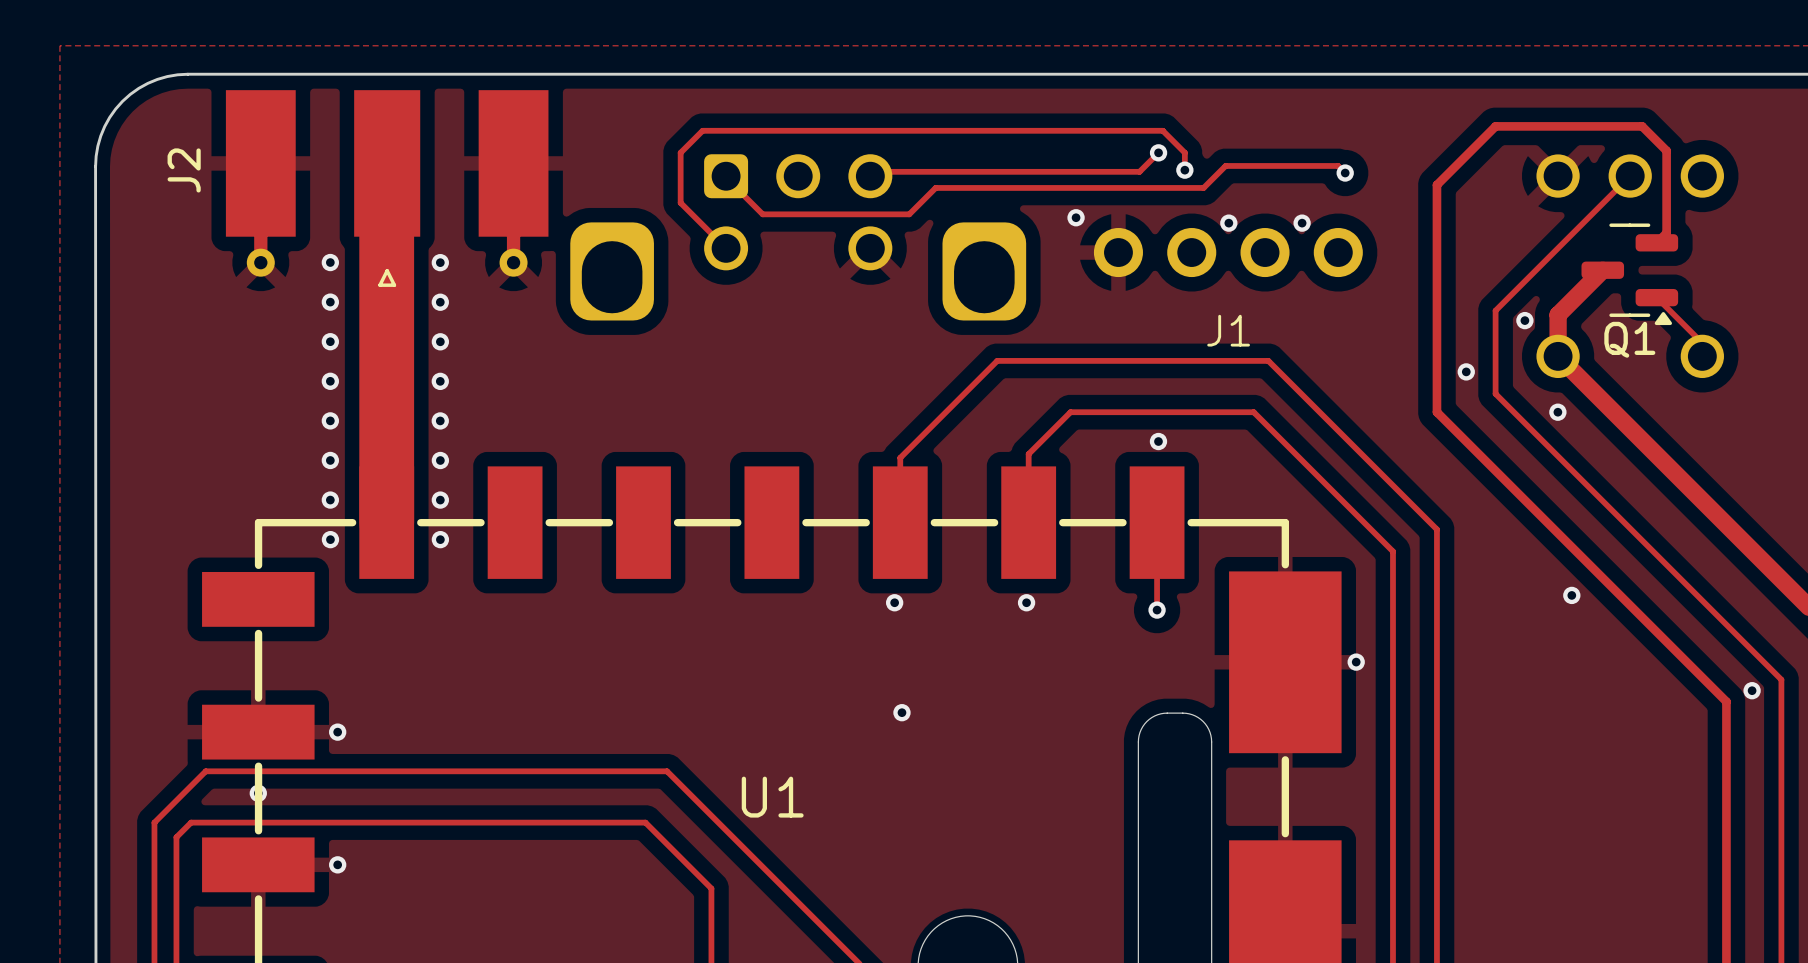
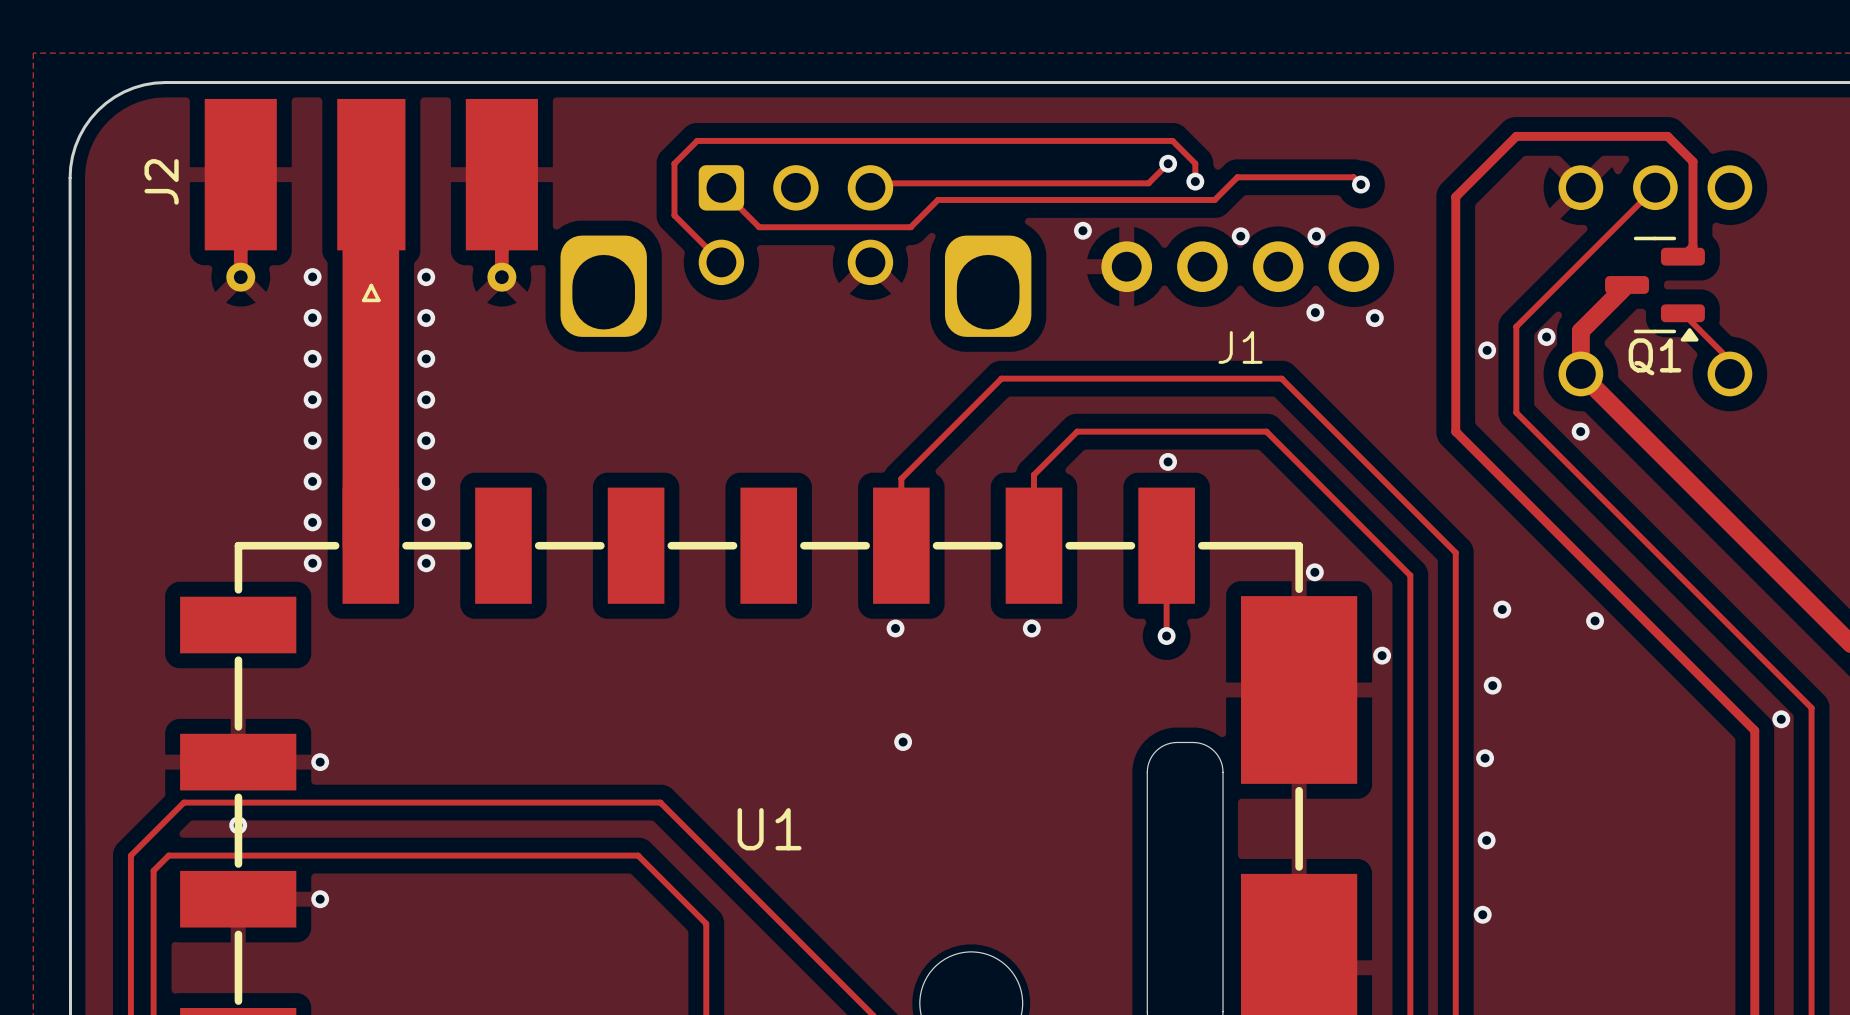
via: none -> (1315, 312)
via: none -> (1374, 318)
via position: (1466, 371) -> (1487, 350)
via: none -> (1314, 572)
via: none -> (1502, 609)
via: none -> (1492, 685)
via position: (1356, 662) -> (1382, 655)
via: none -> (1485, 758)
via: none -> (1486, 840)
via: none -> (1482, 914)

